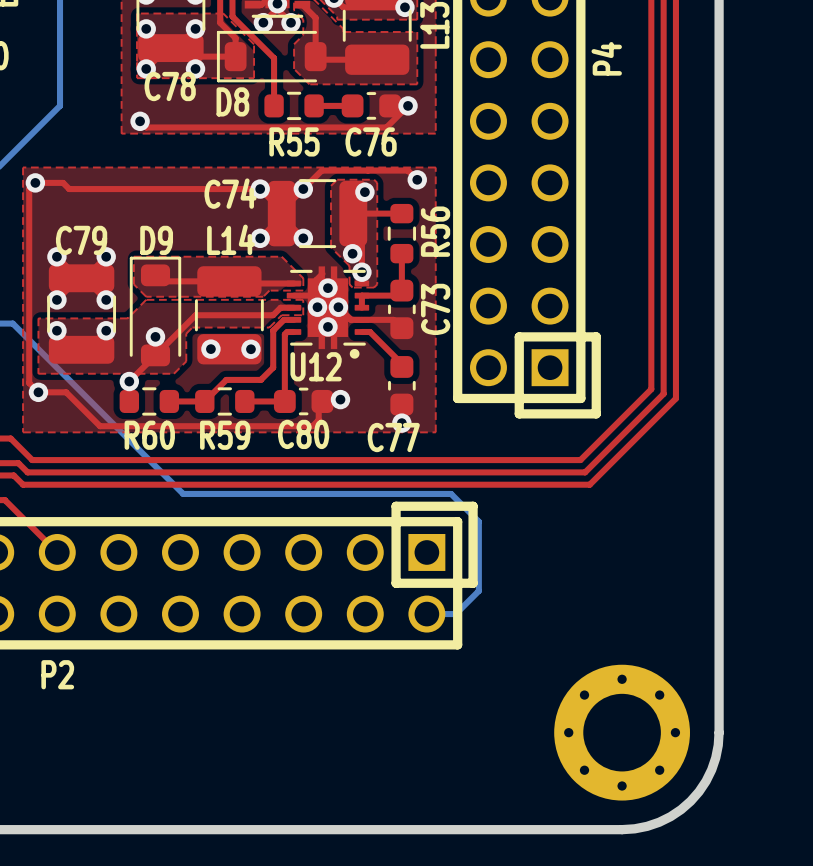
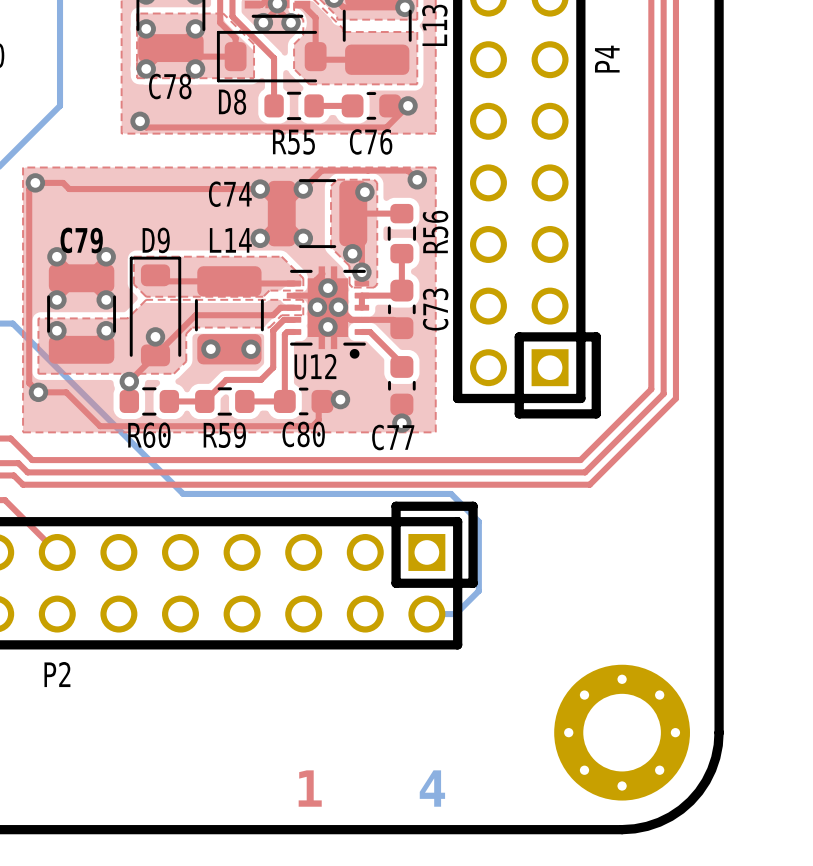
text: none -> 4 (432, 788)
text: none -> 1 (310, 788)

